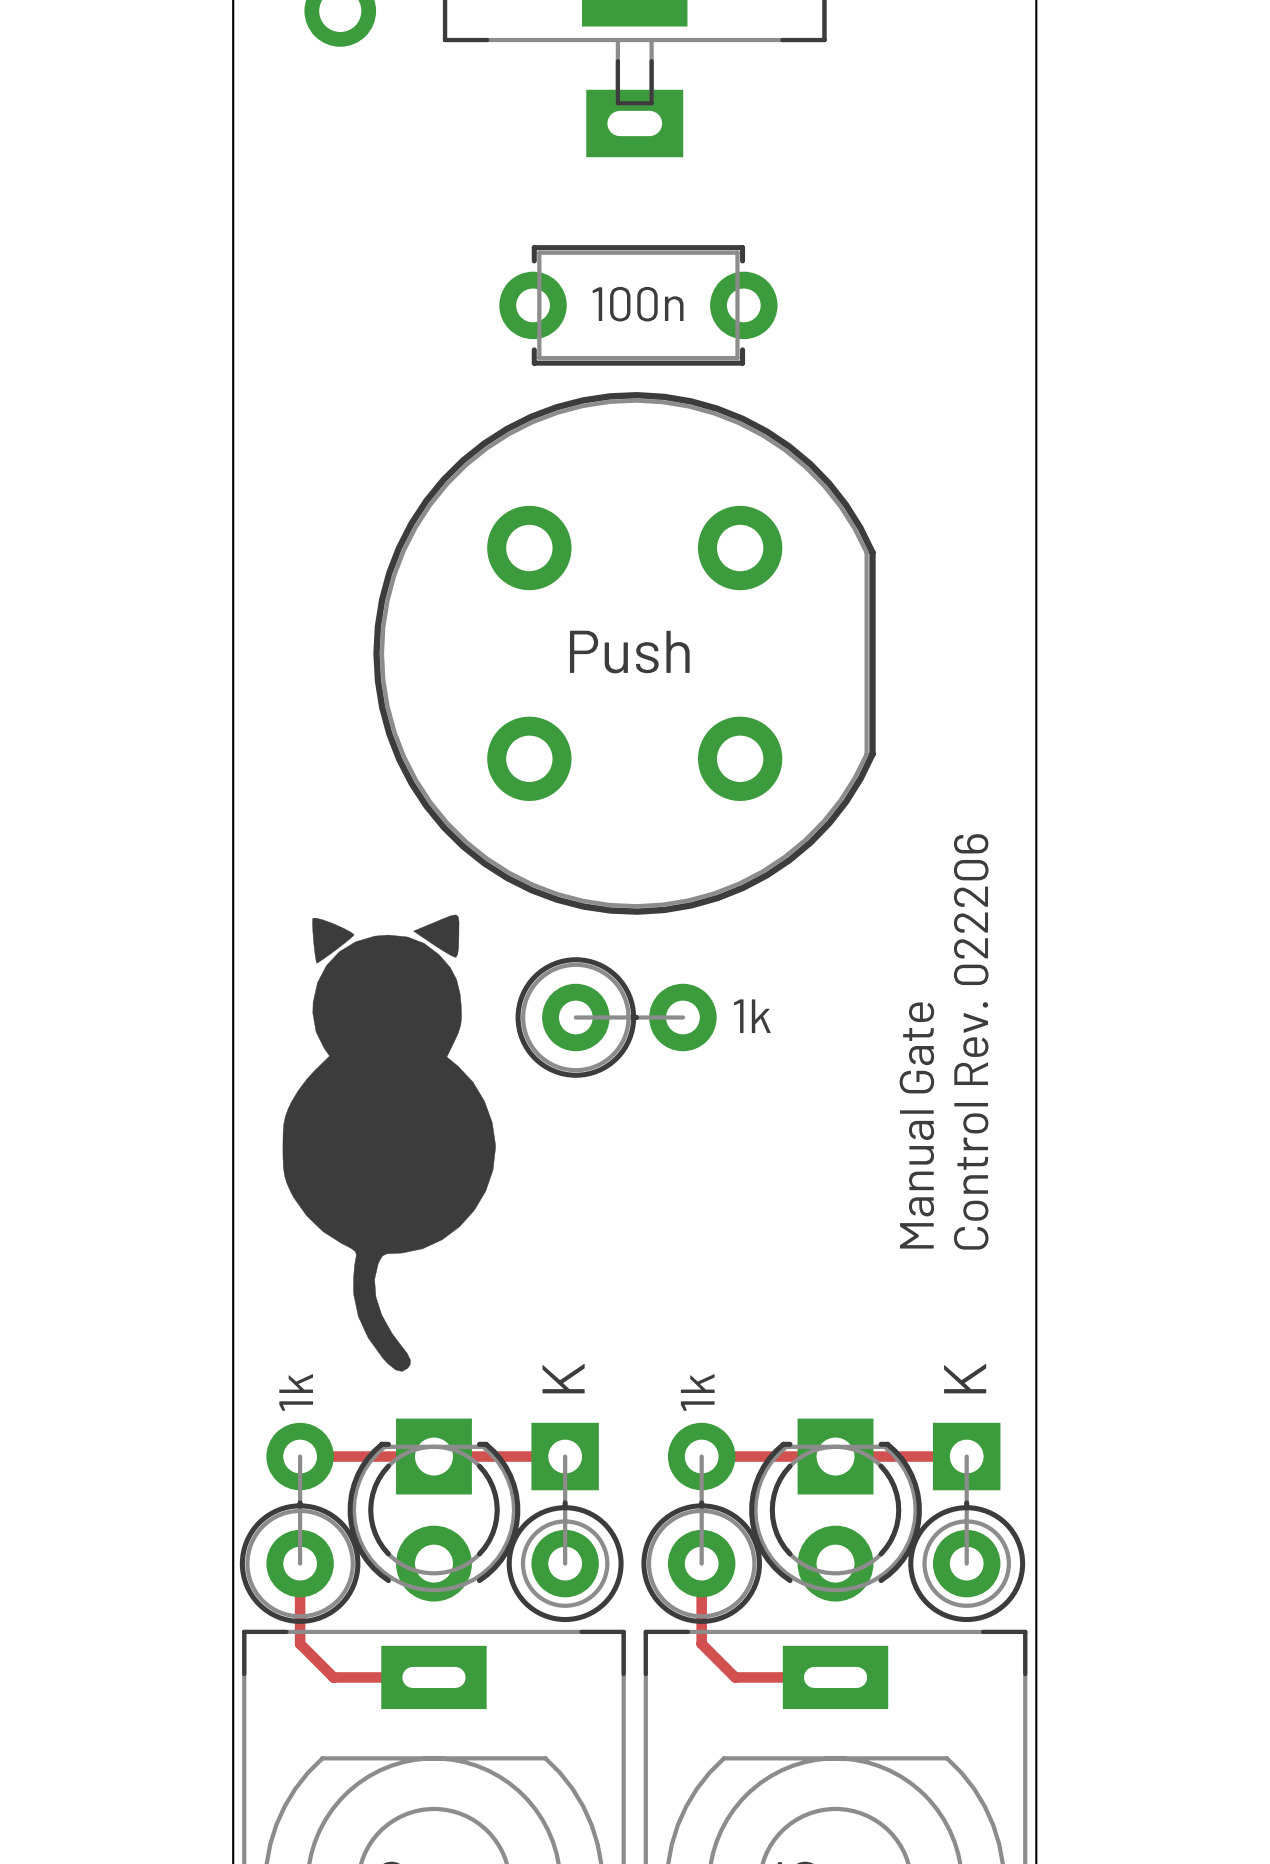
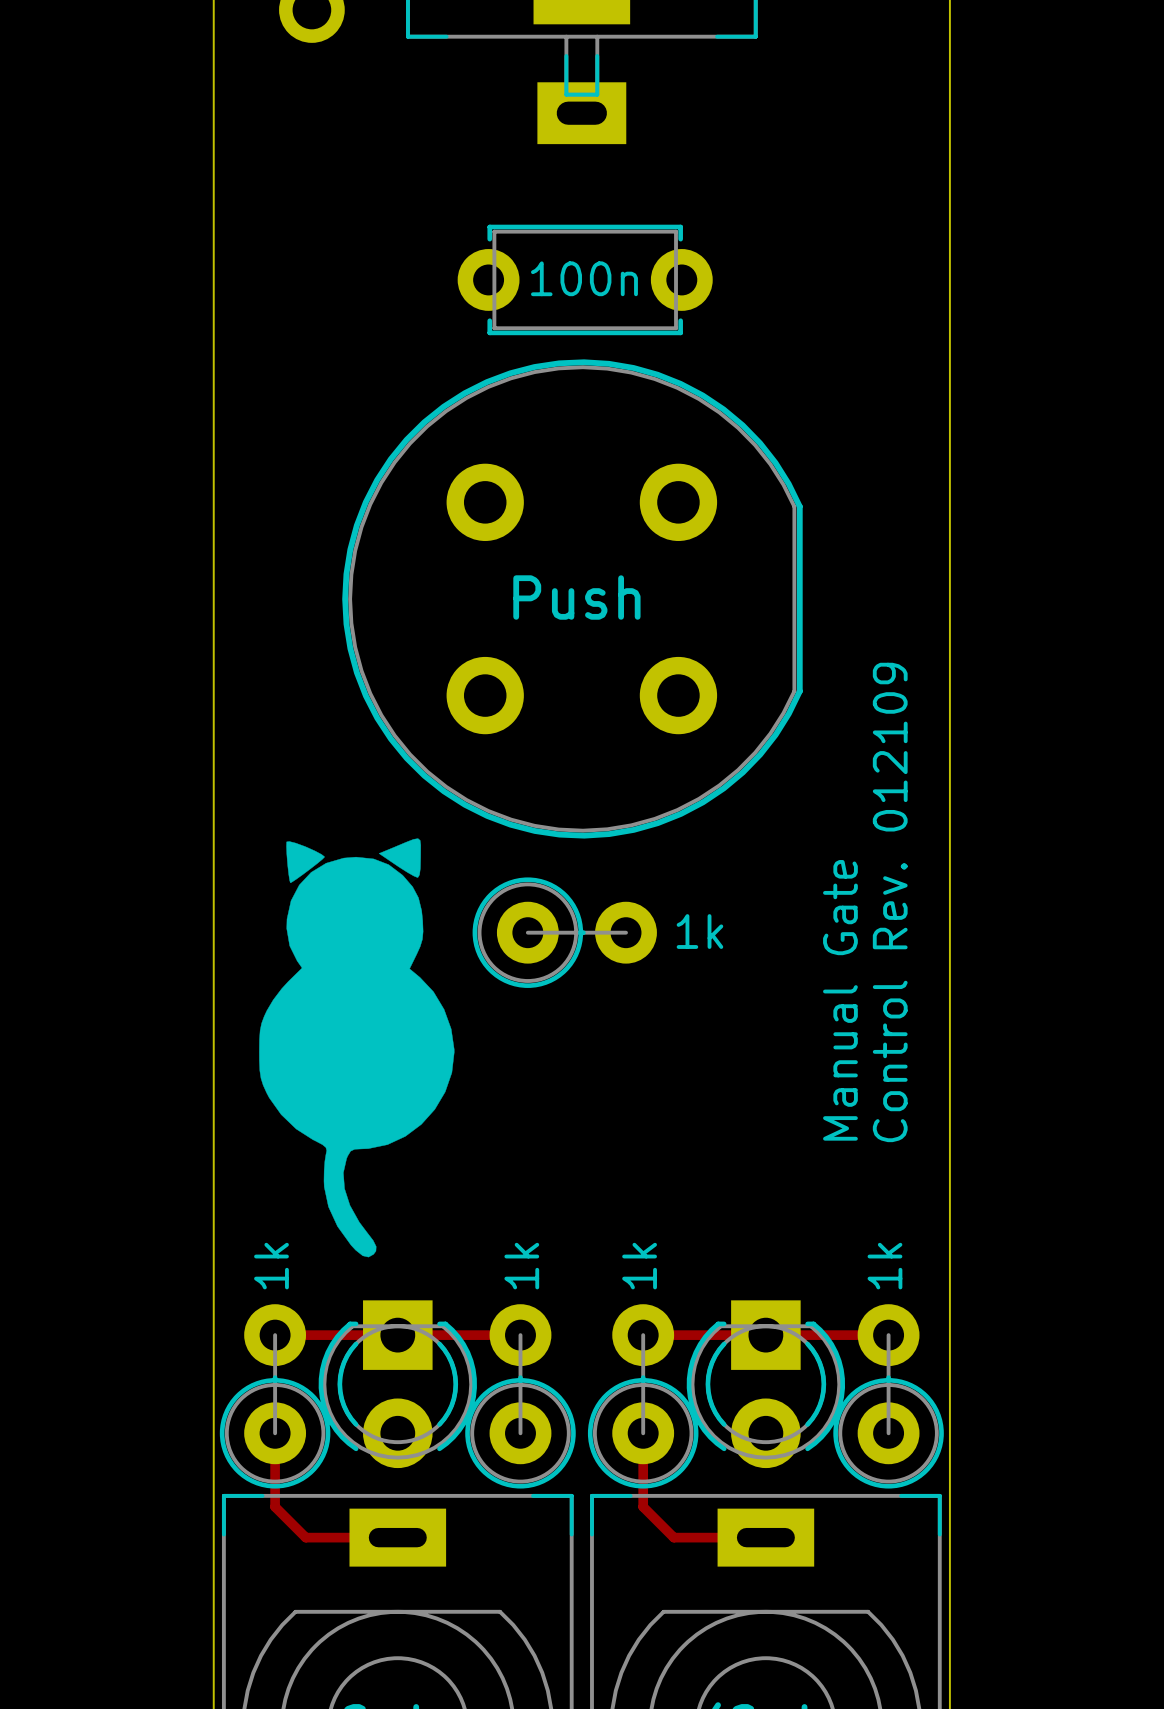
text: Control Rev. 022206 (971, 1041) -> Control Rev. 012109 (890, 902)
part value: none -> 1k (521, 1266)
part value: none -> 1k (884, 1266)
part footprint: [506, 1422, 624, 1623] -> [465, 1304, 576, 1489]
part footprint: [908, 1422, 1026, 1623] -> [833, 1304, 944, 1489]

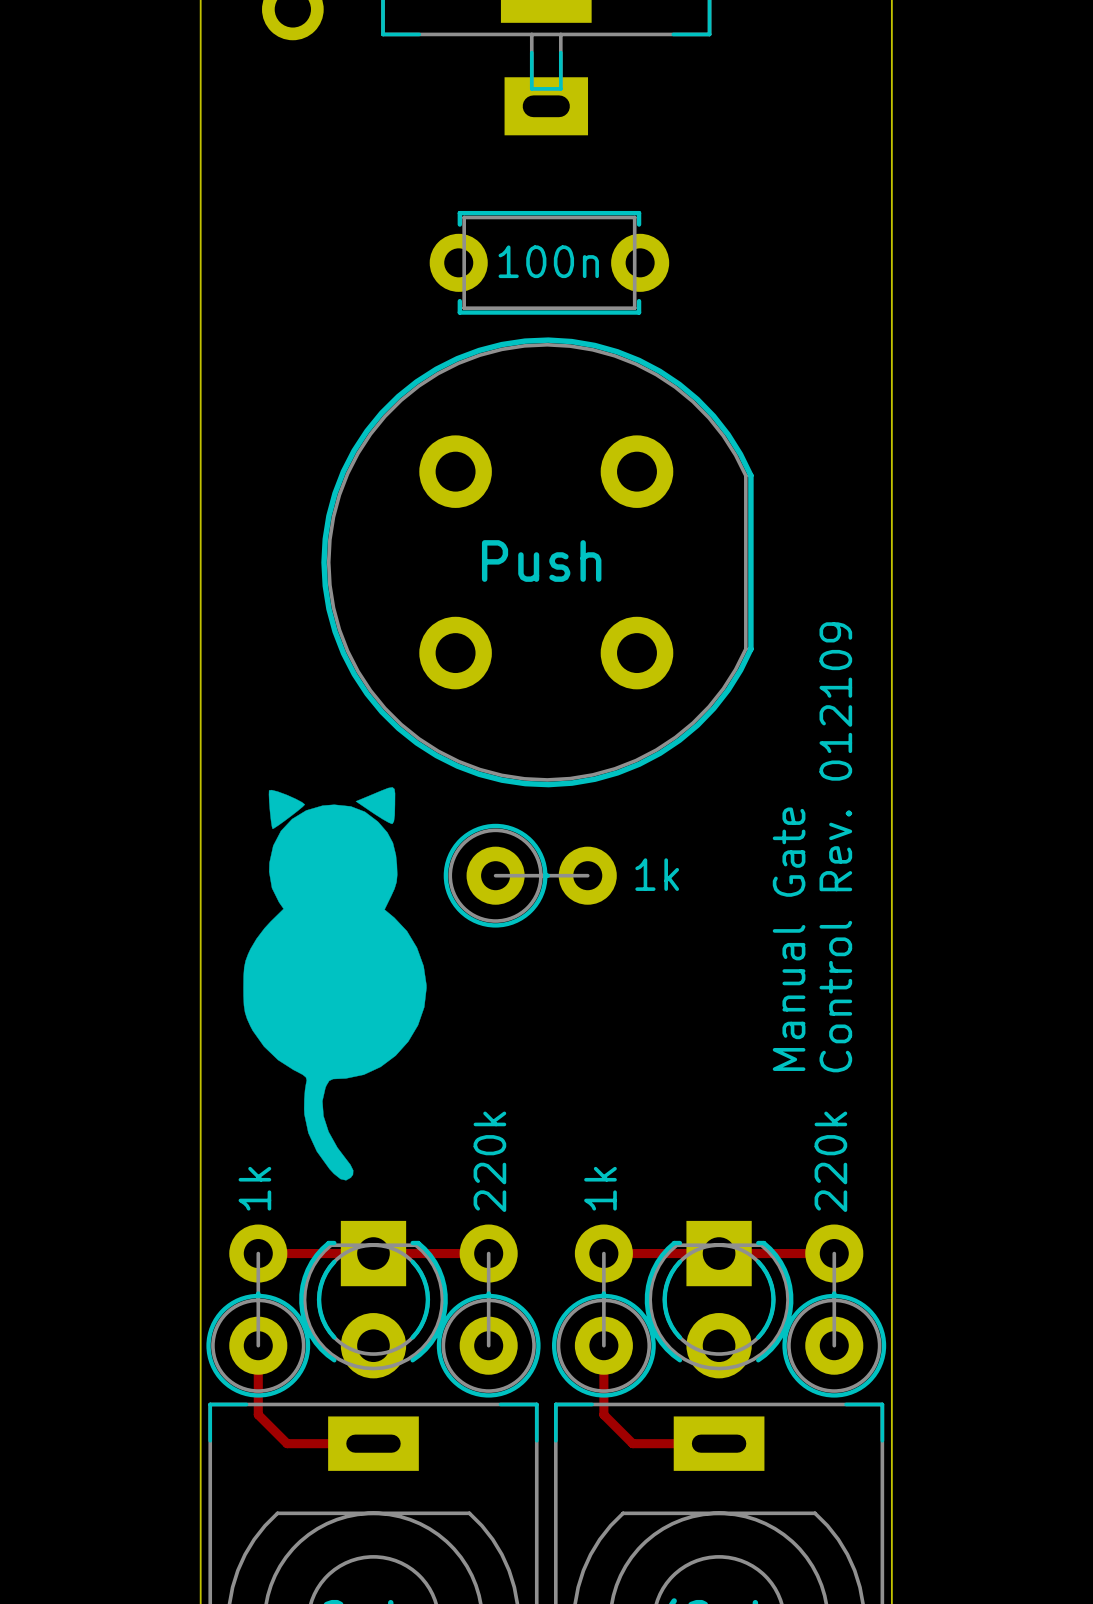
part value: 1k (521, 1266) -> 220k (489, 1161)
part value: 1k (884, 1266) -> 220k (830, 1161)

